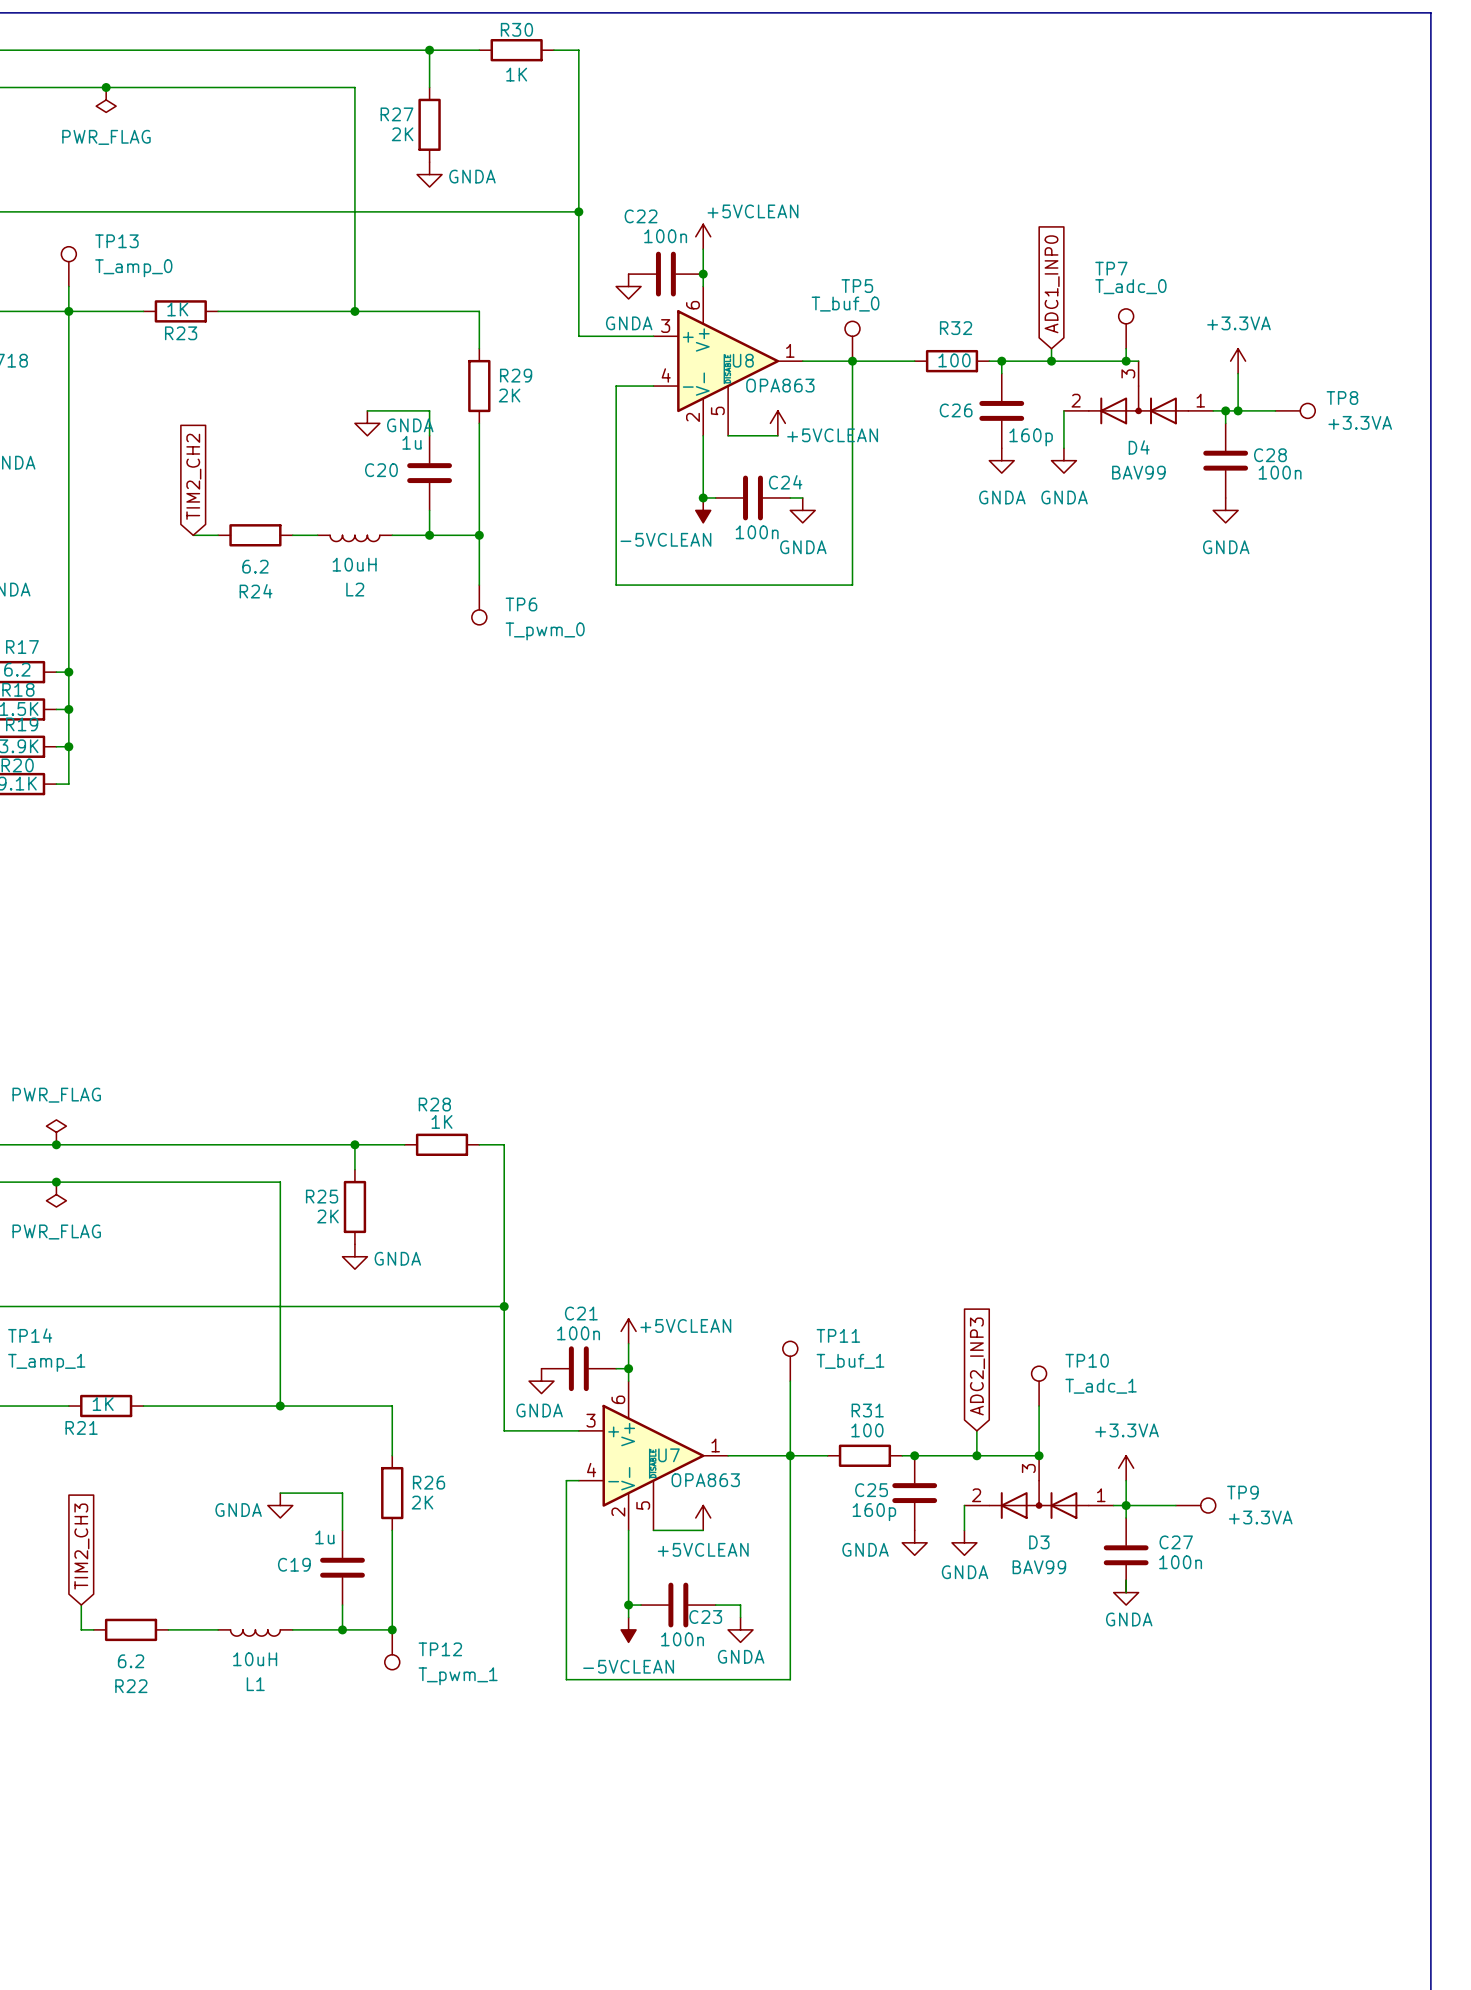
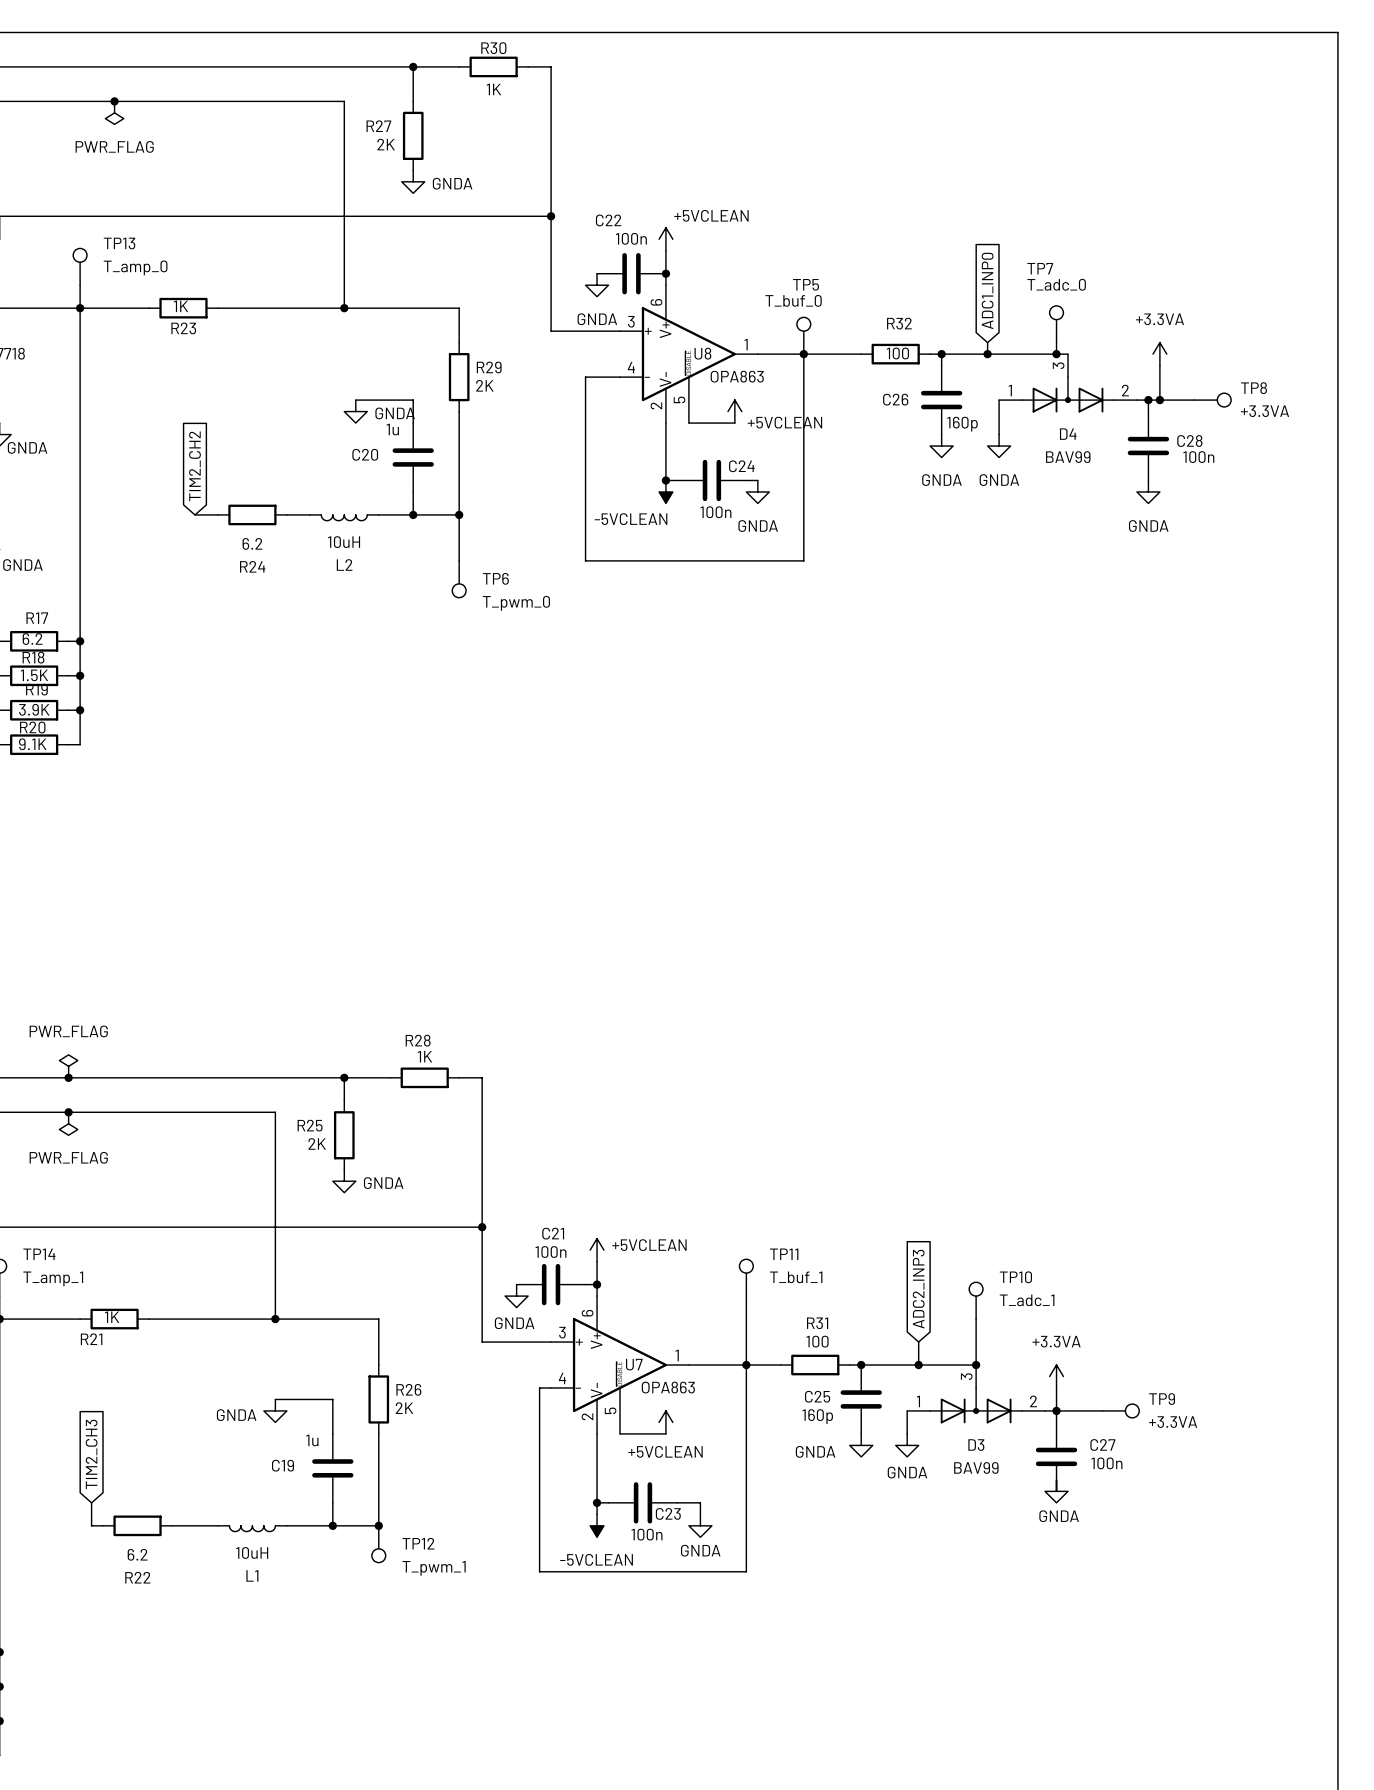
D4 flip: as is (1138, 405) -> left-right (1068, 394)
D3 flip: as is (1039, 1499) -> left-right (976, 1405)

